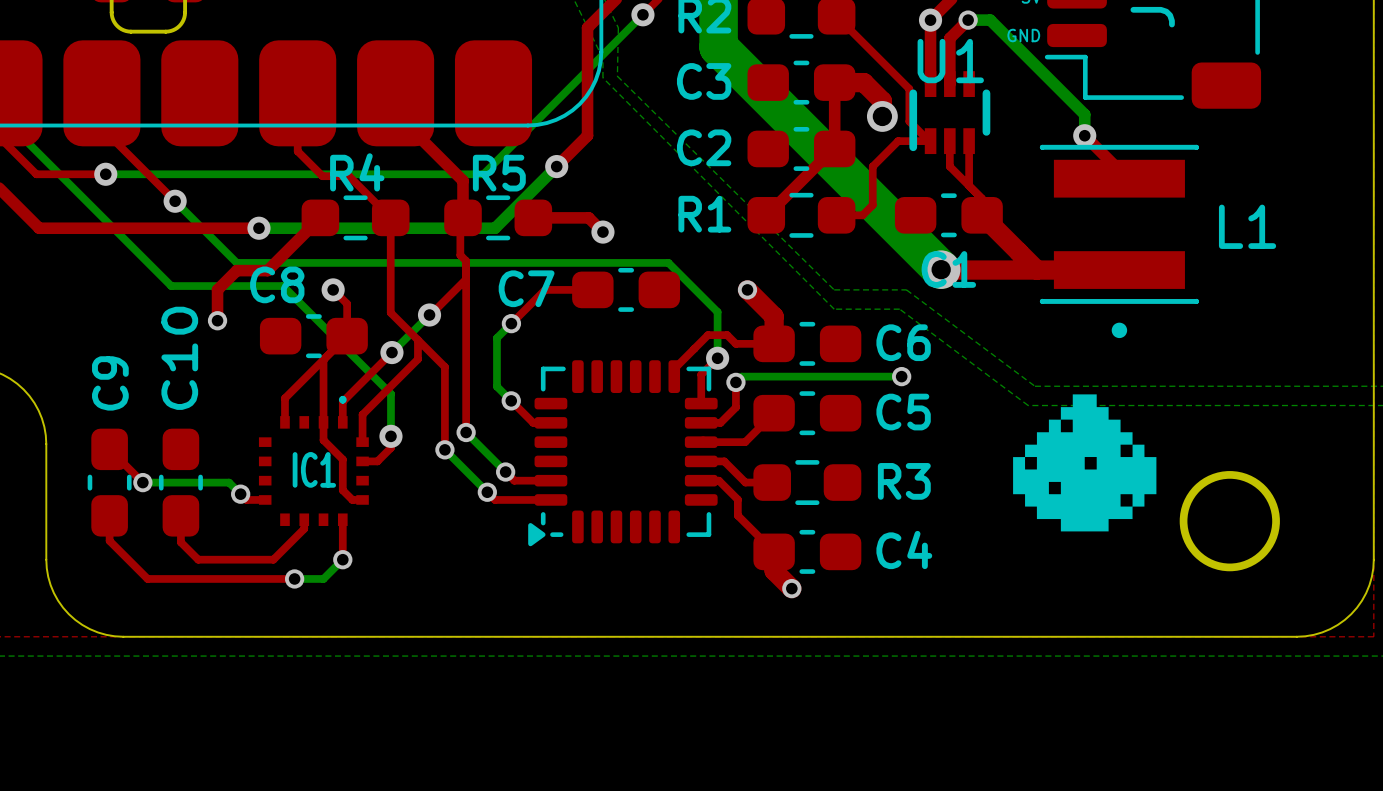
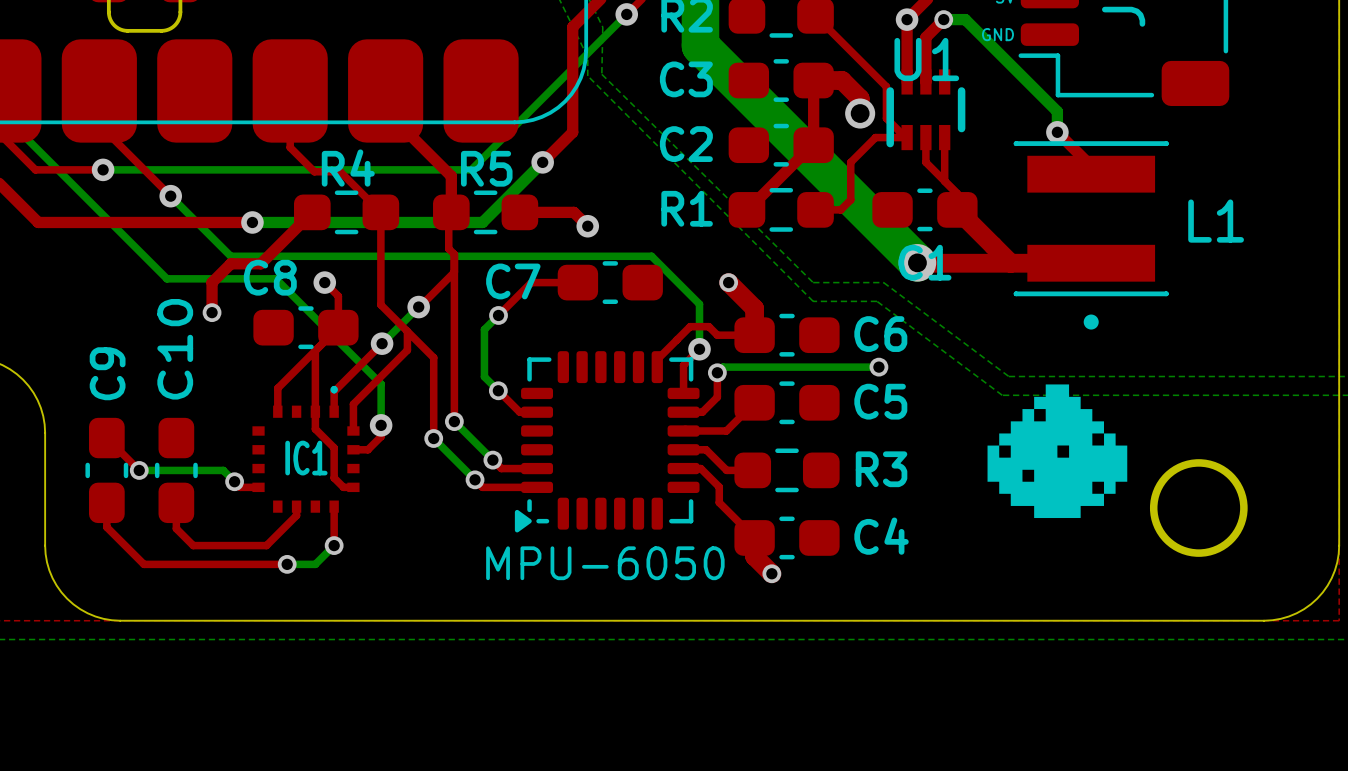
part value: none -> MPU-6050 (605, 563)

